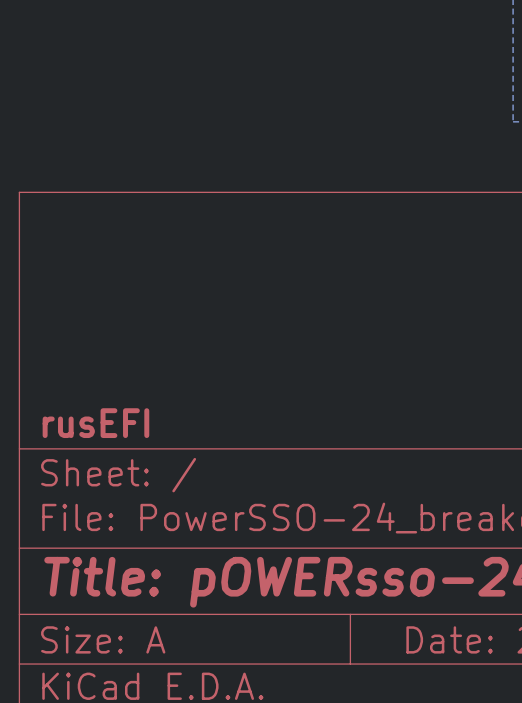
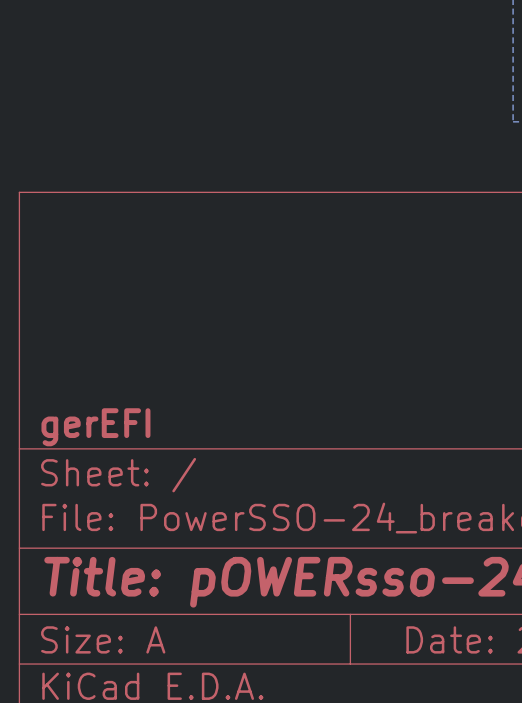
title block: rusEFI (95, 423) -> gerEFI (95, 427)

